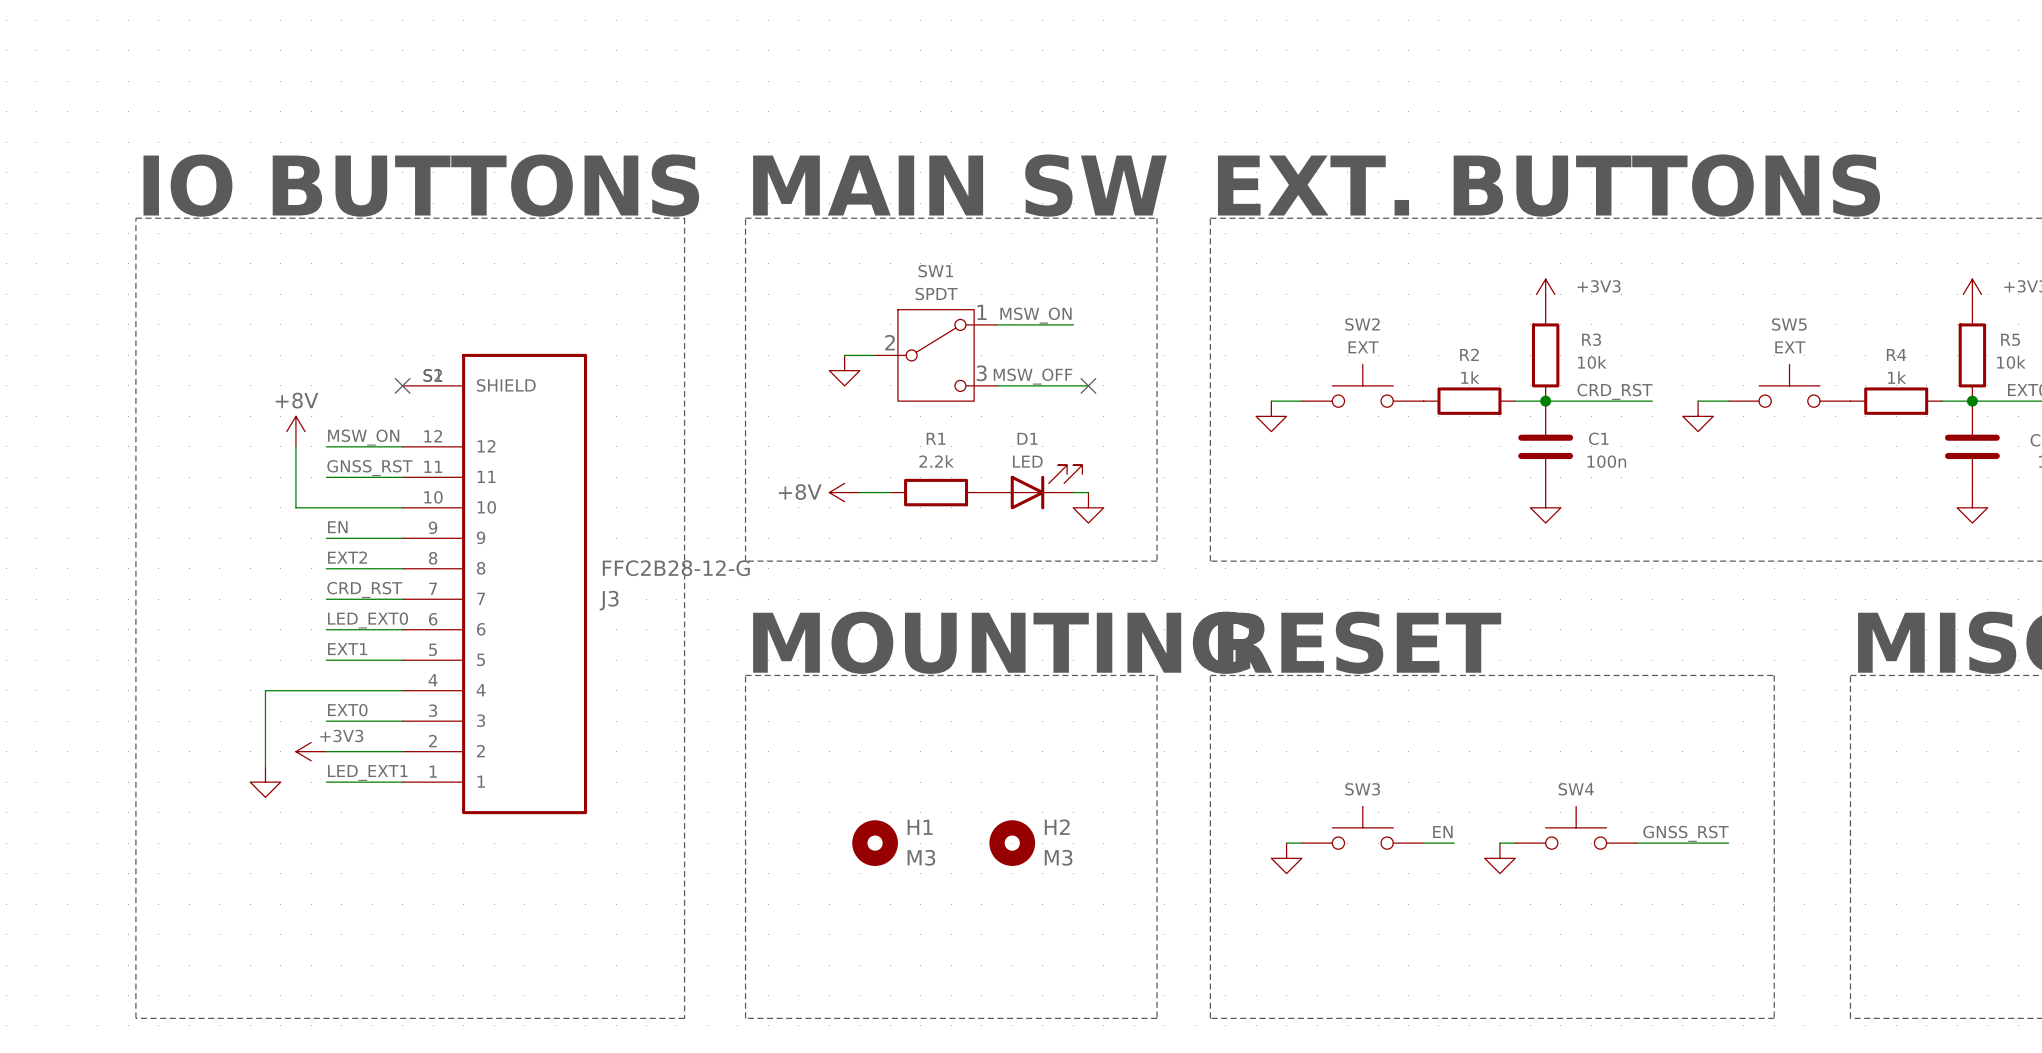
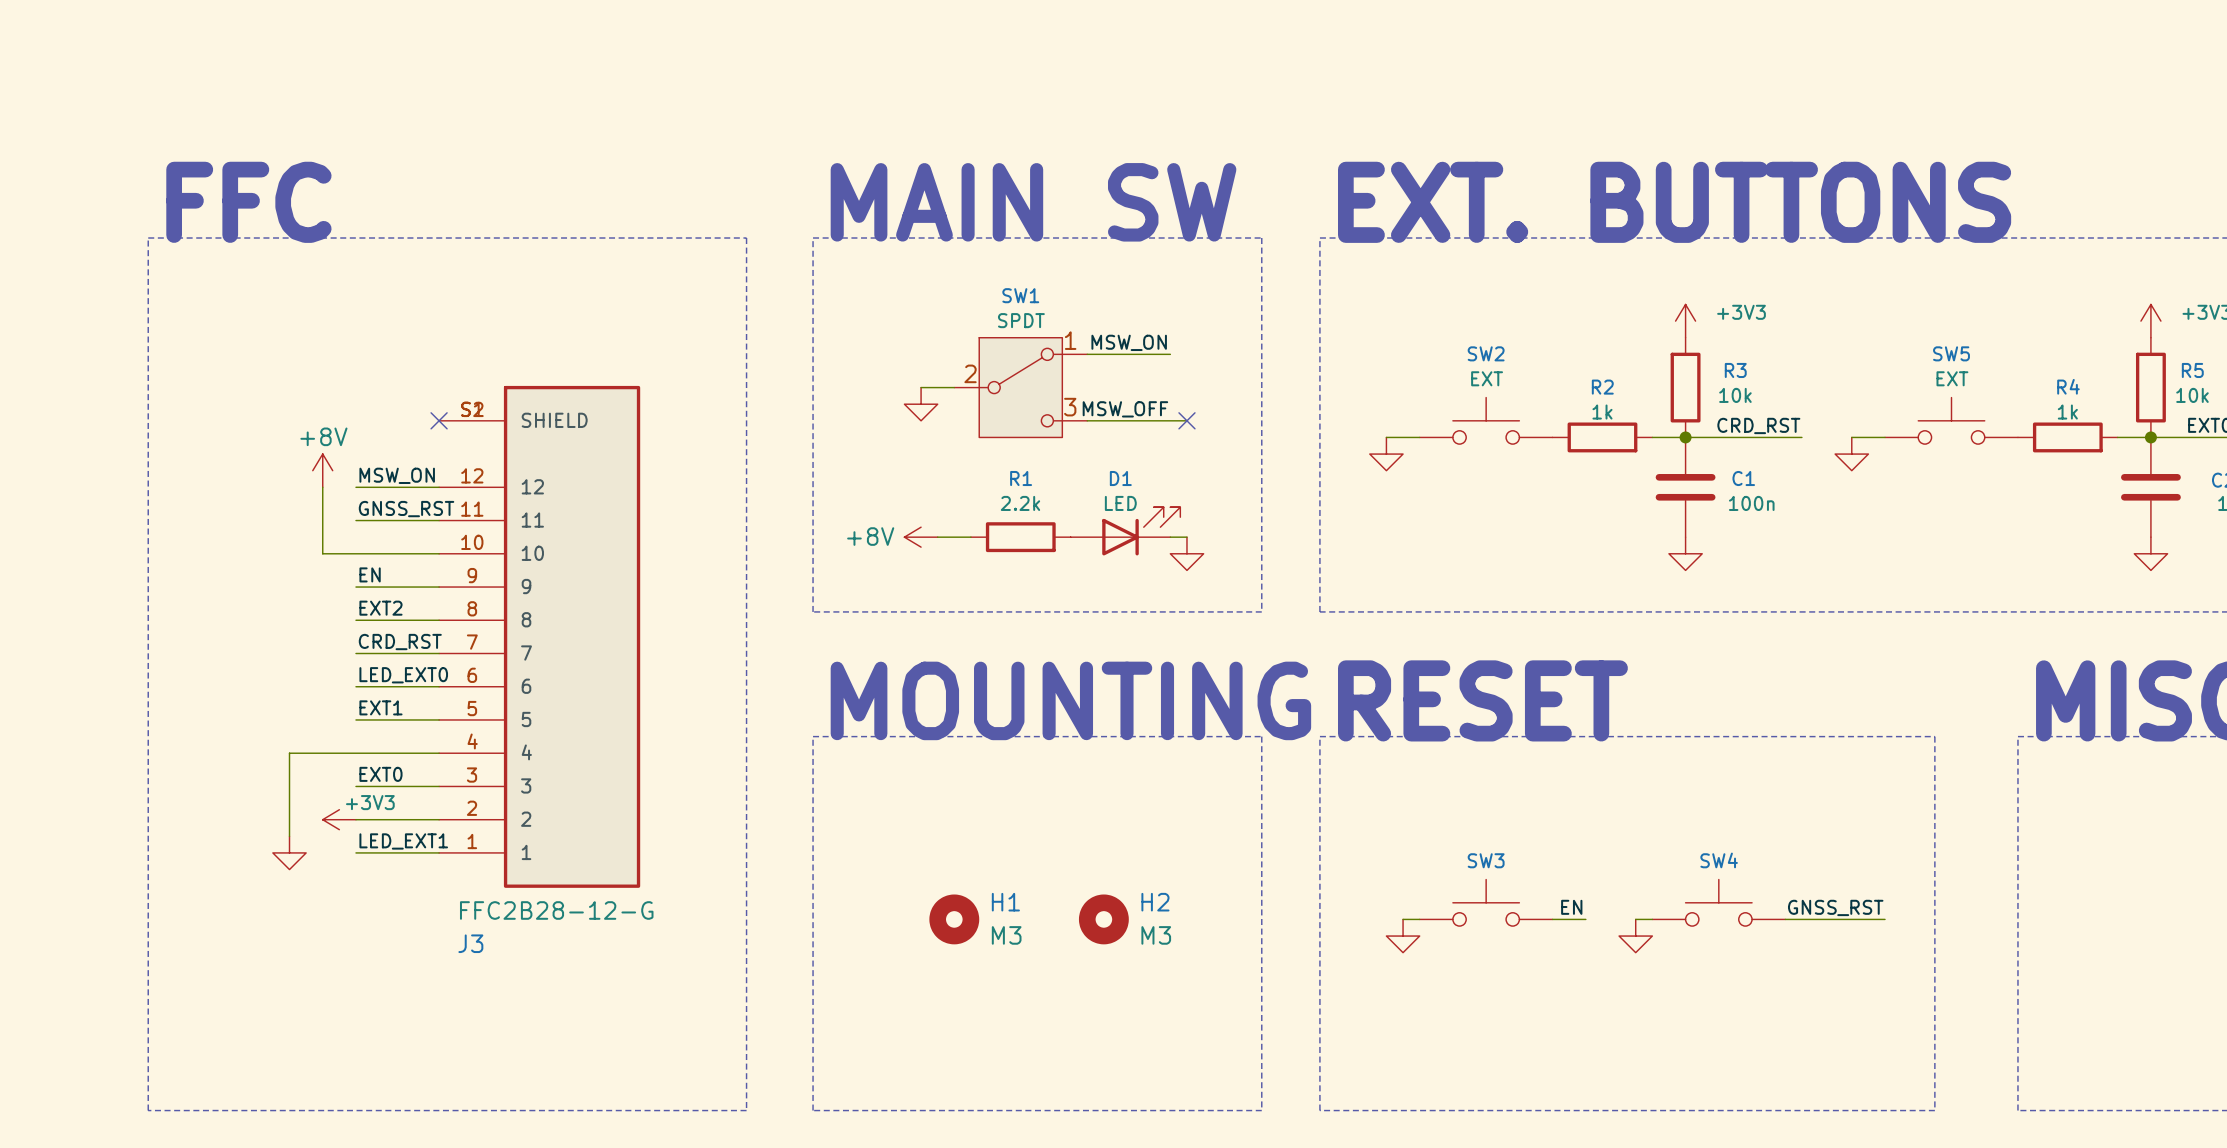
text: IO BUTTONS (421, 185) -> FFC (248, 202)
J3 value position: FFC2B28-12-G (676, 568) -> FFC2B28-12-G (556, 910)
J3 name position: J3 (609, 600) -> J3 (470, 943)

